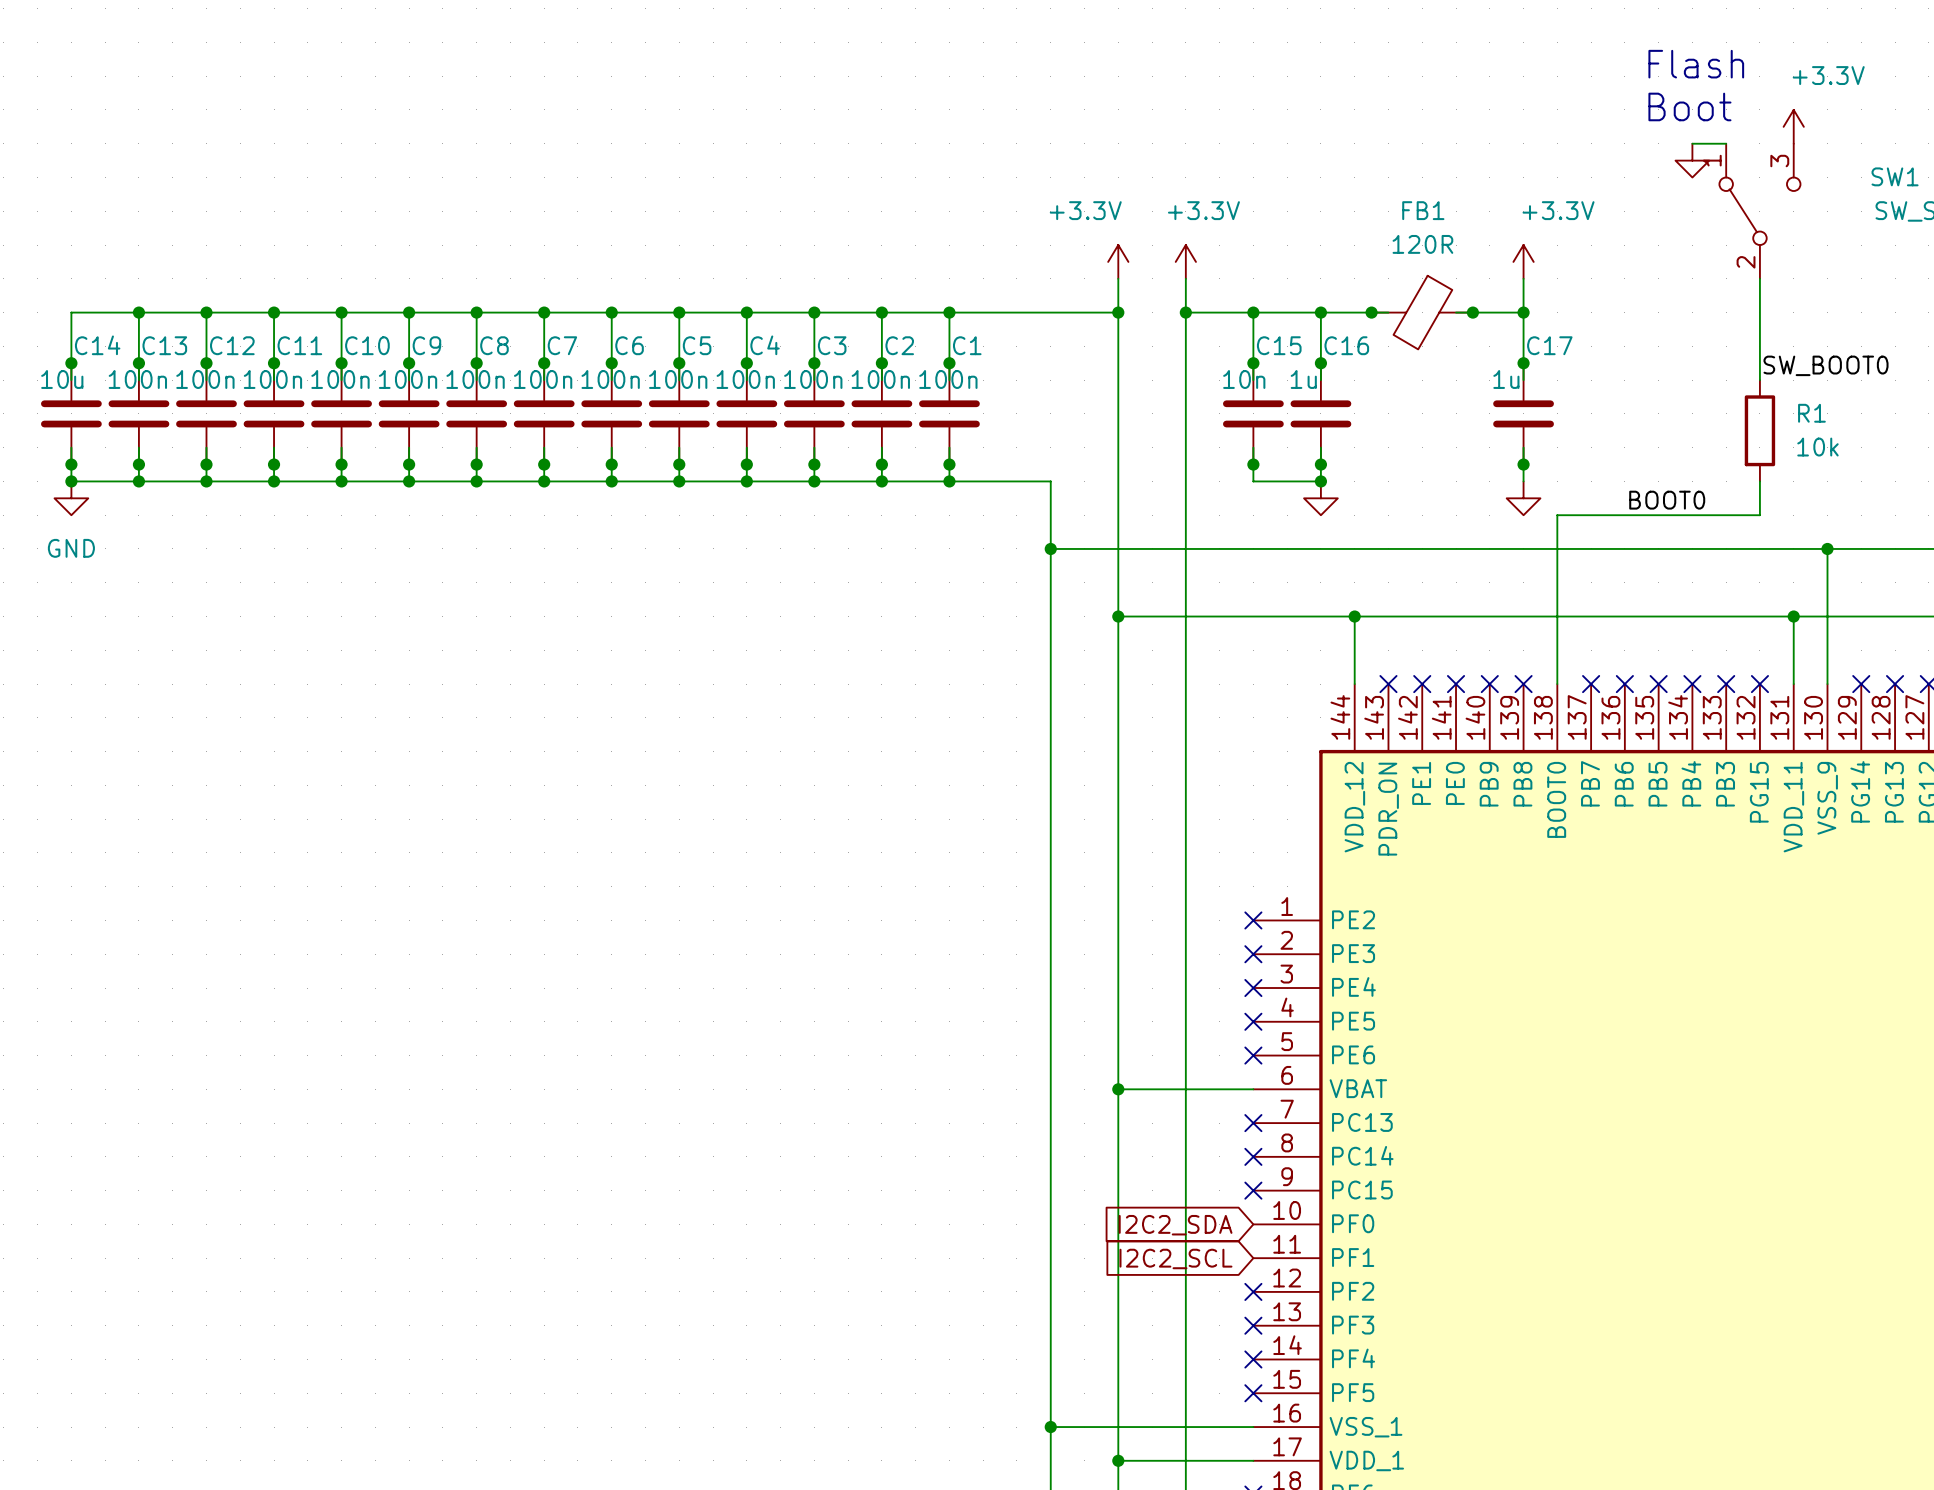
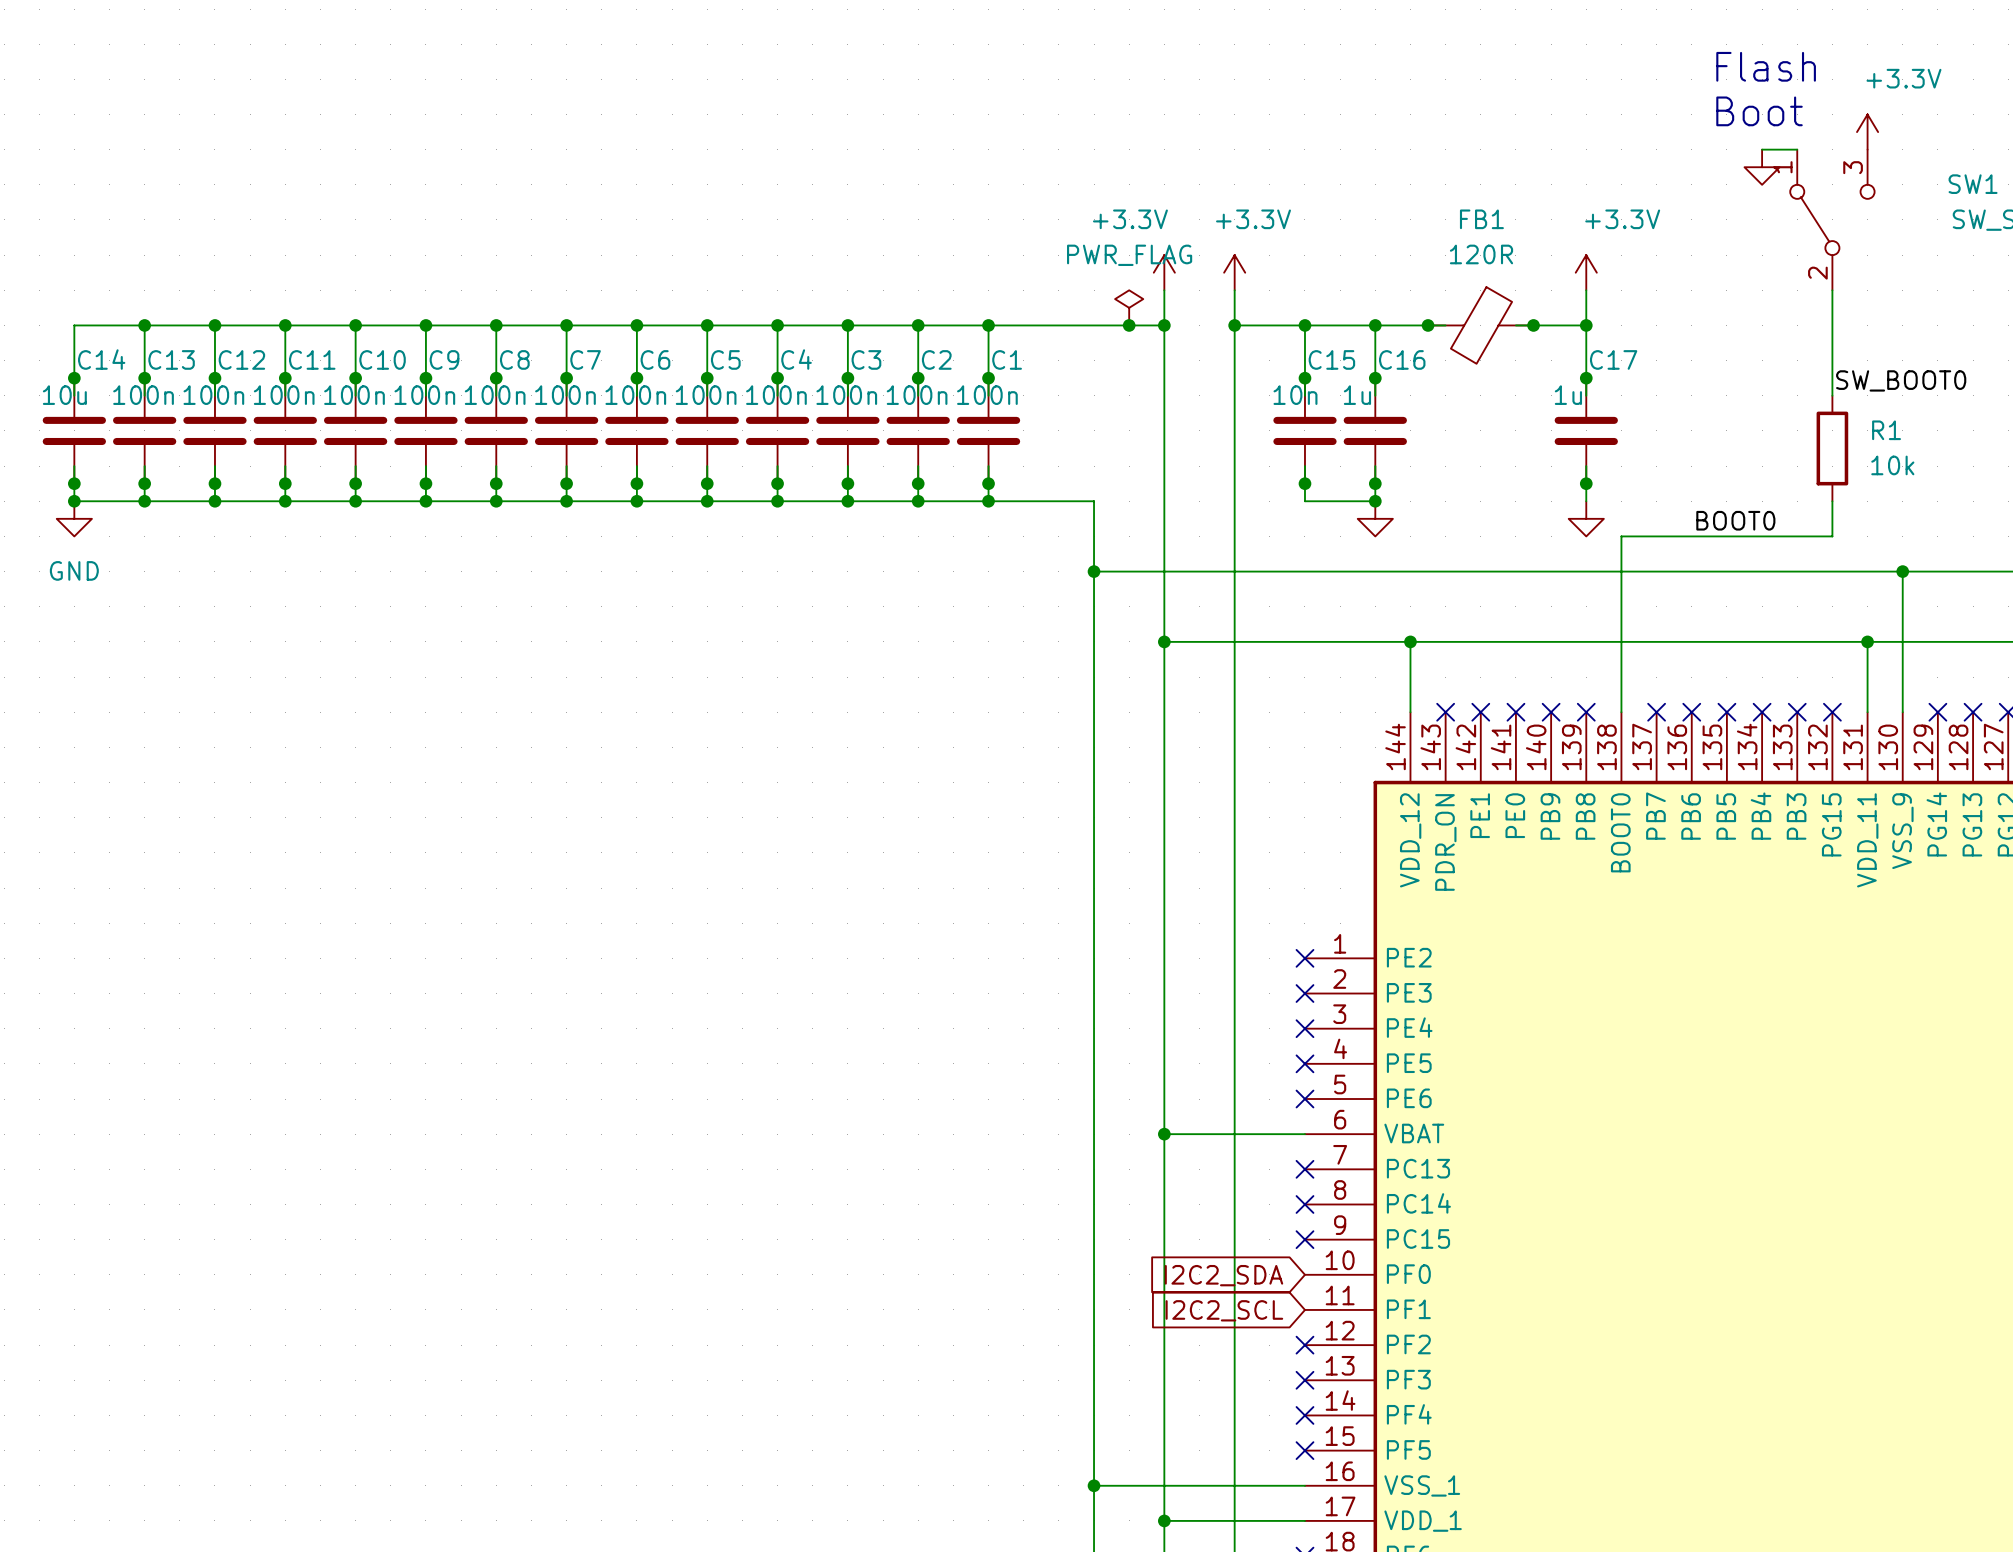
power symbol: none -> PWR_FLAG (1129, 307)
junction: none -> (1129, 325)

